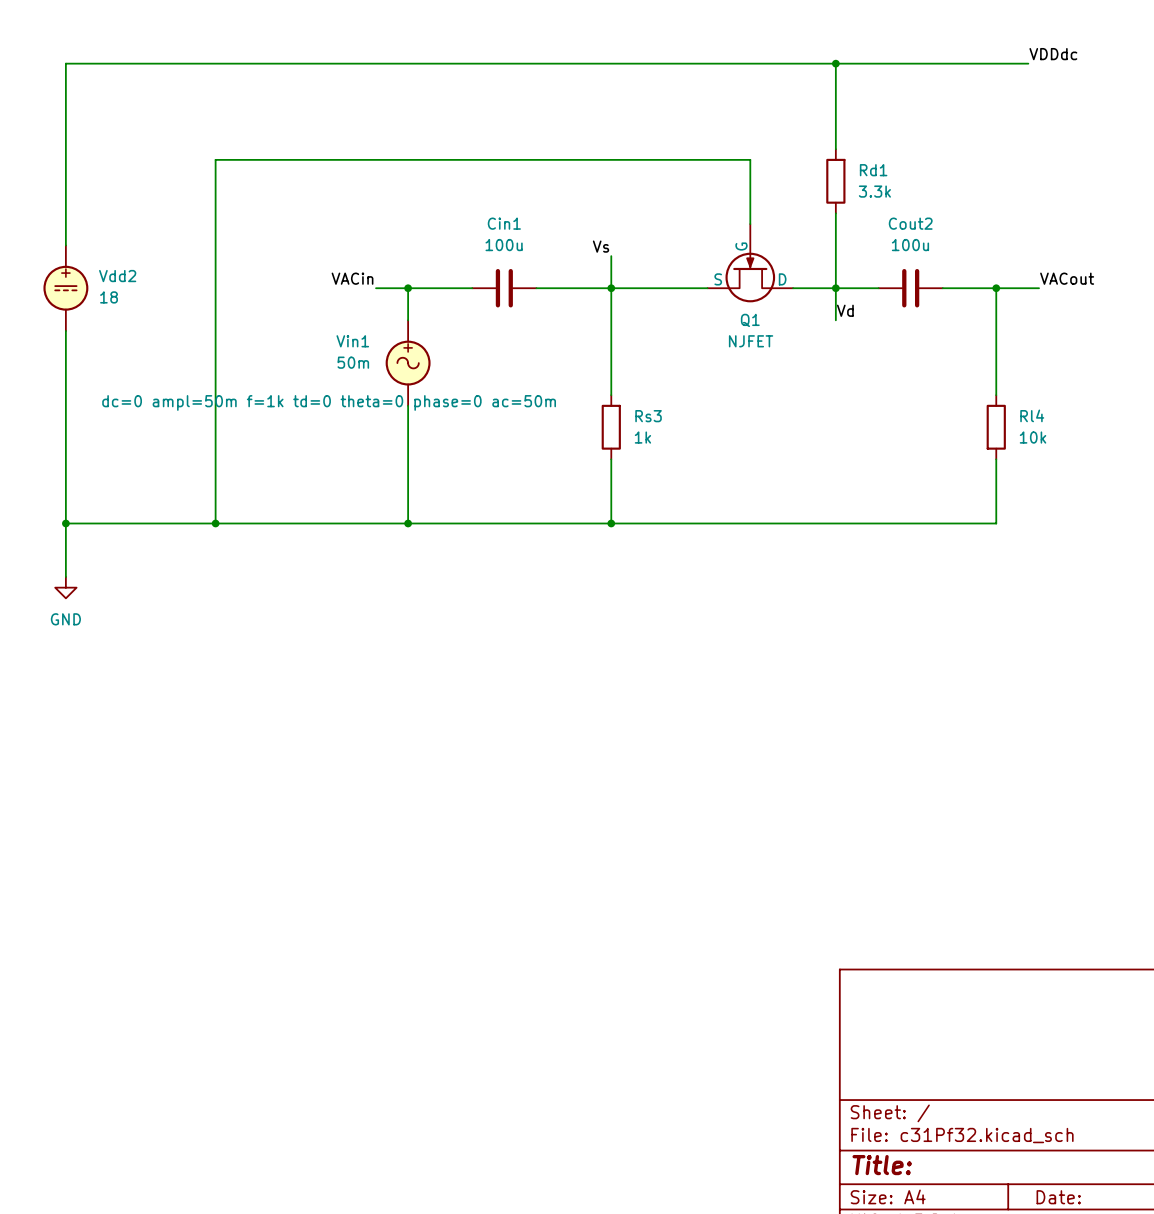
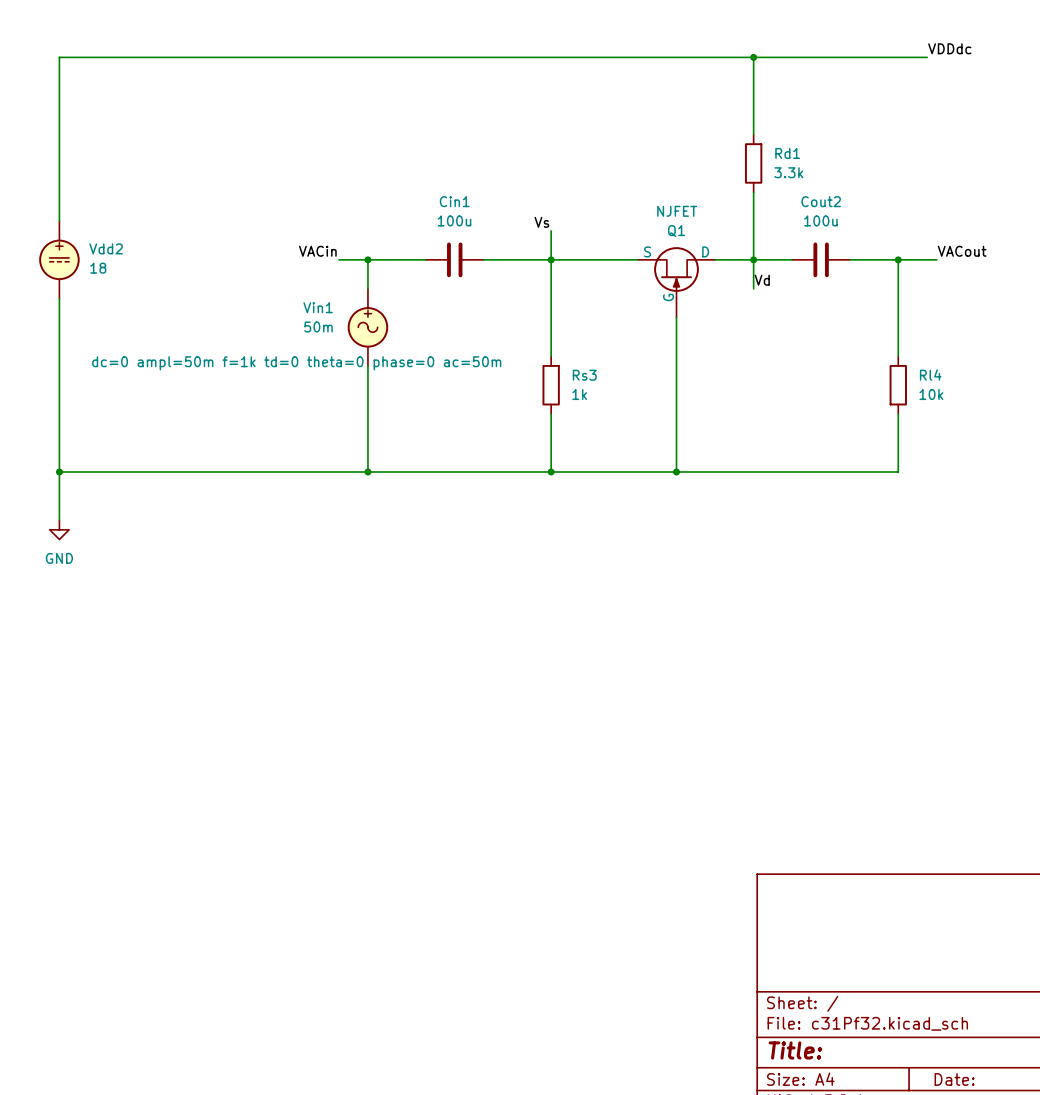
wire: (750, 224) (750, 159) (215, 159) (215, 523) -> none
Q1 flip: as is (750, 277) -> up-down (676, 269)
wire: none -> (676, 317) (676, 471)
junction: (215, 523) -> none
junction: none -> (676, 471)

